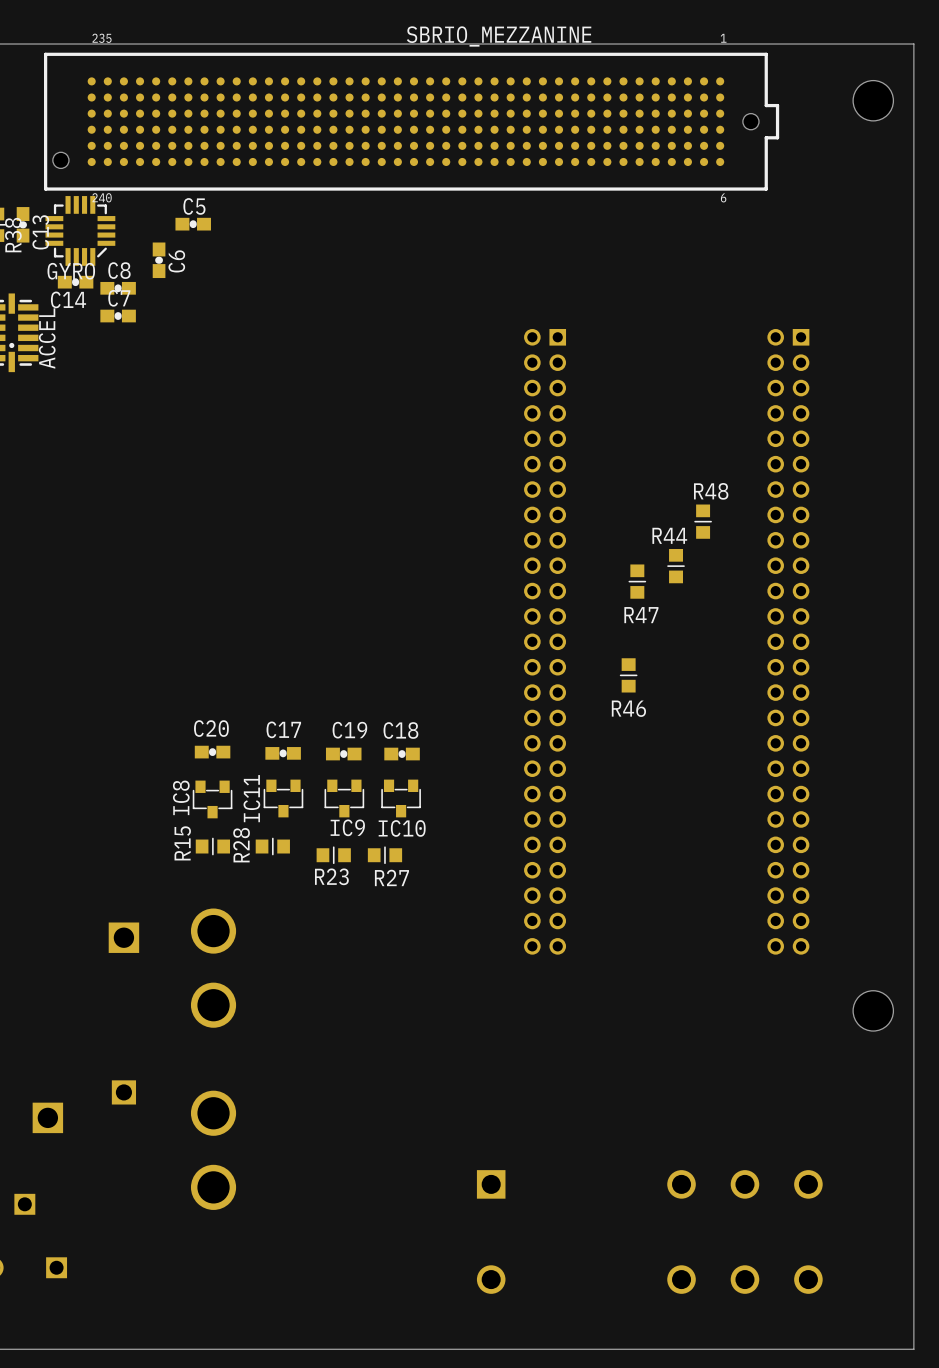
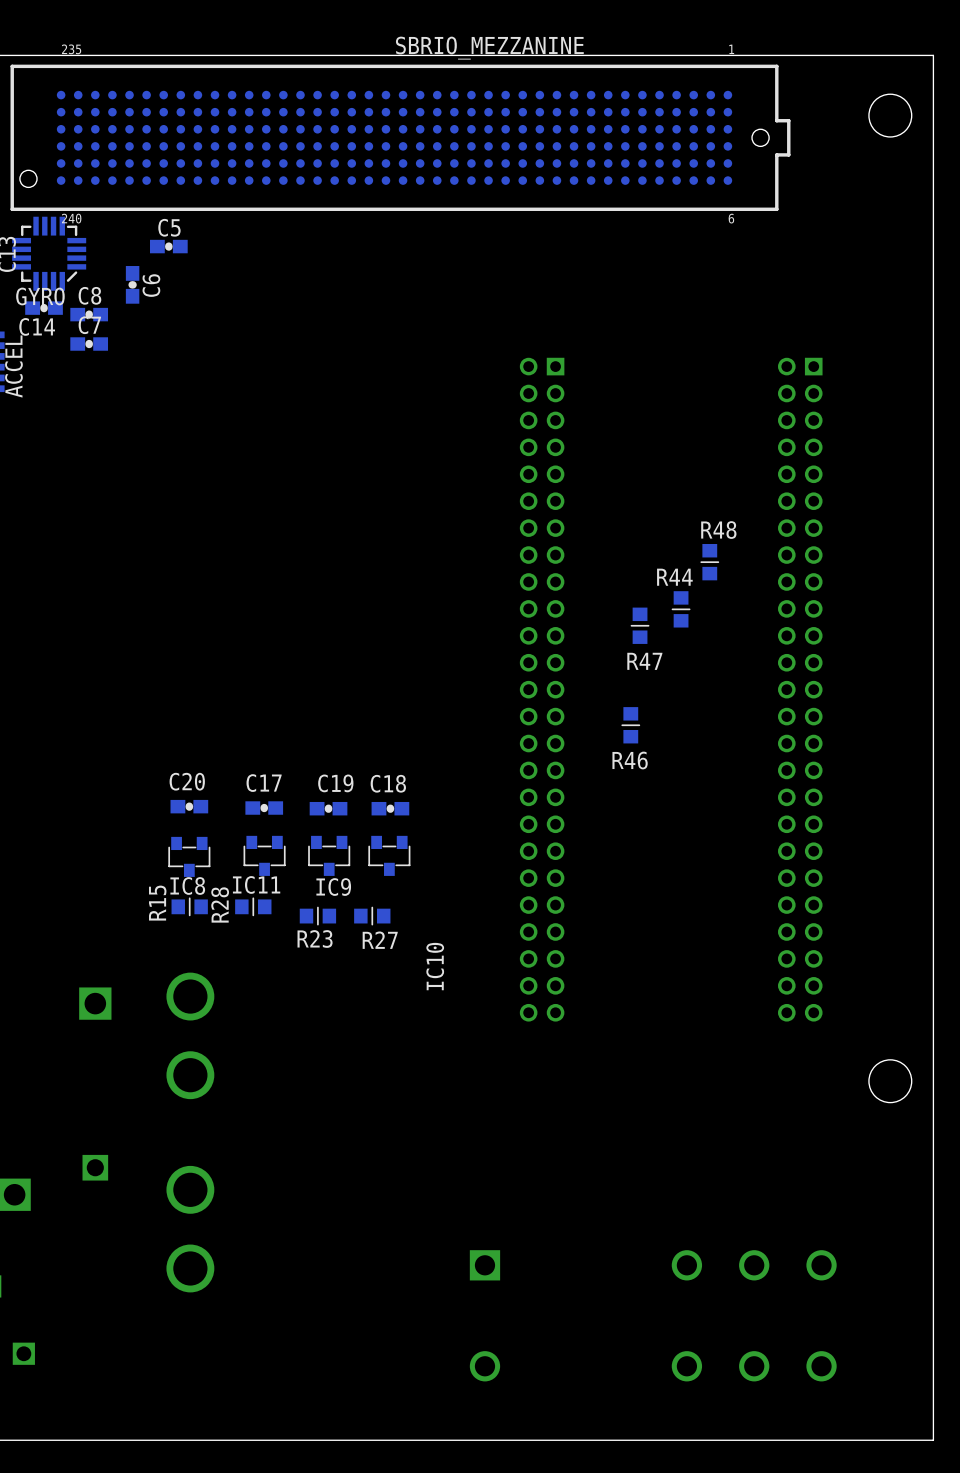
IC8 name rotation: 0° (181, 797) -> 90° clockwise (187, 885)
IC11 name rotation: 0° (251, 798) -> 90° clockwise (256, 884)
IC10 name rotation: 0° (402, 828) -> 90° counterclockwise (435, 966)
IC10 name position: IC10 (402, 828) -> IC10 (435, 966)

